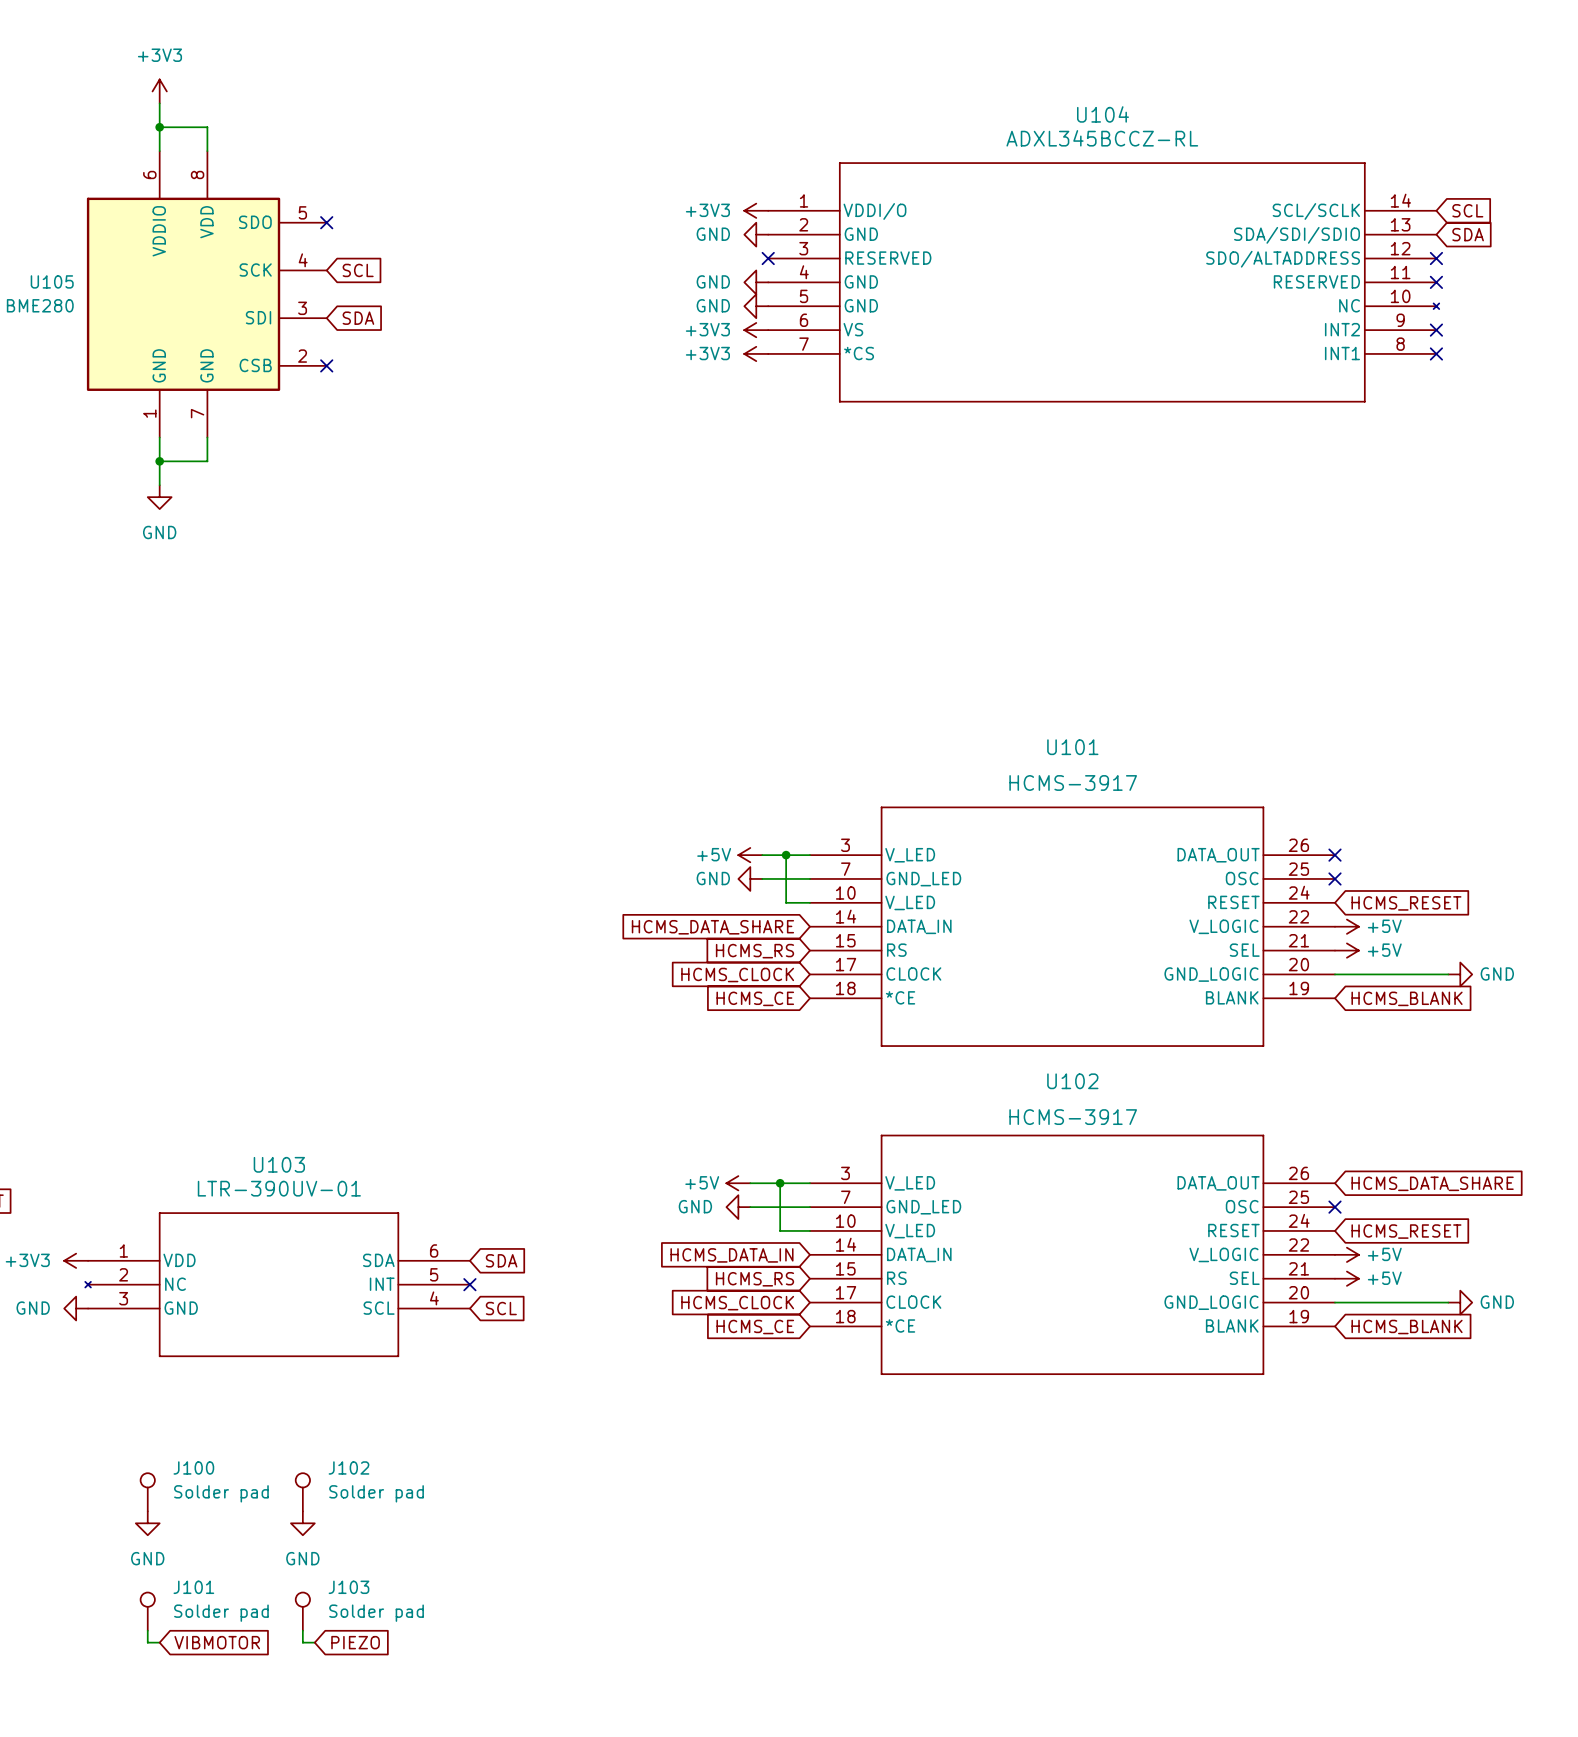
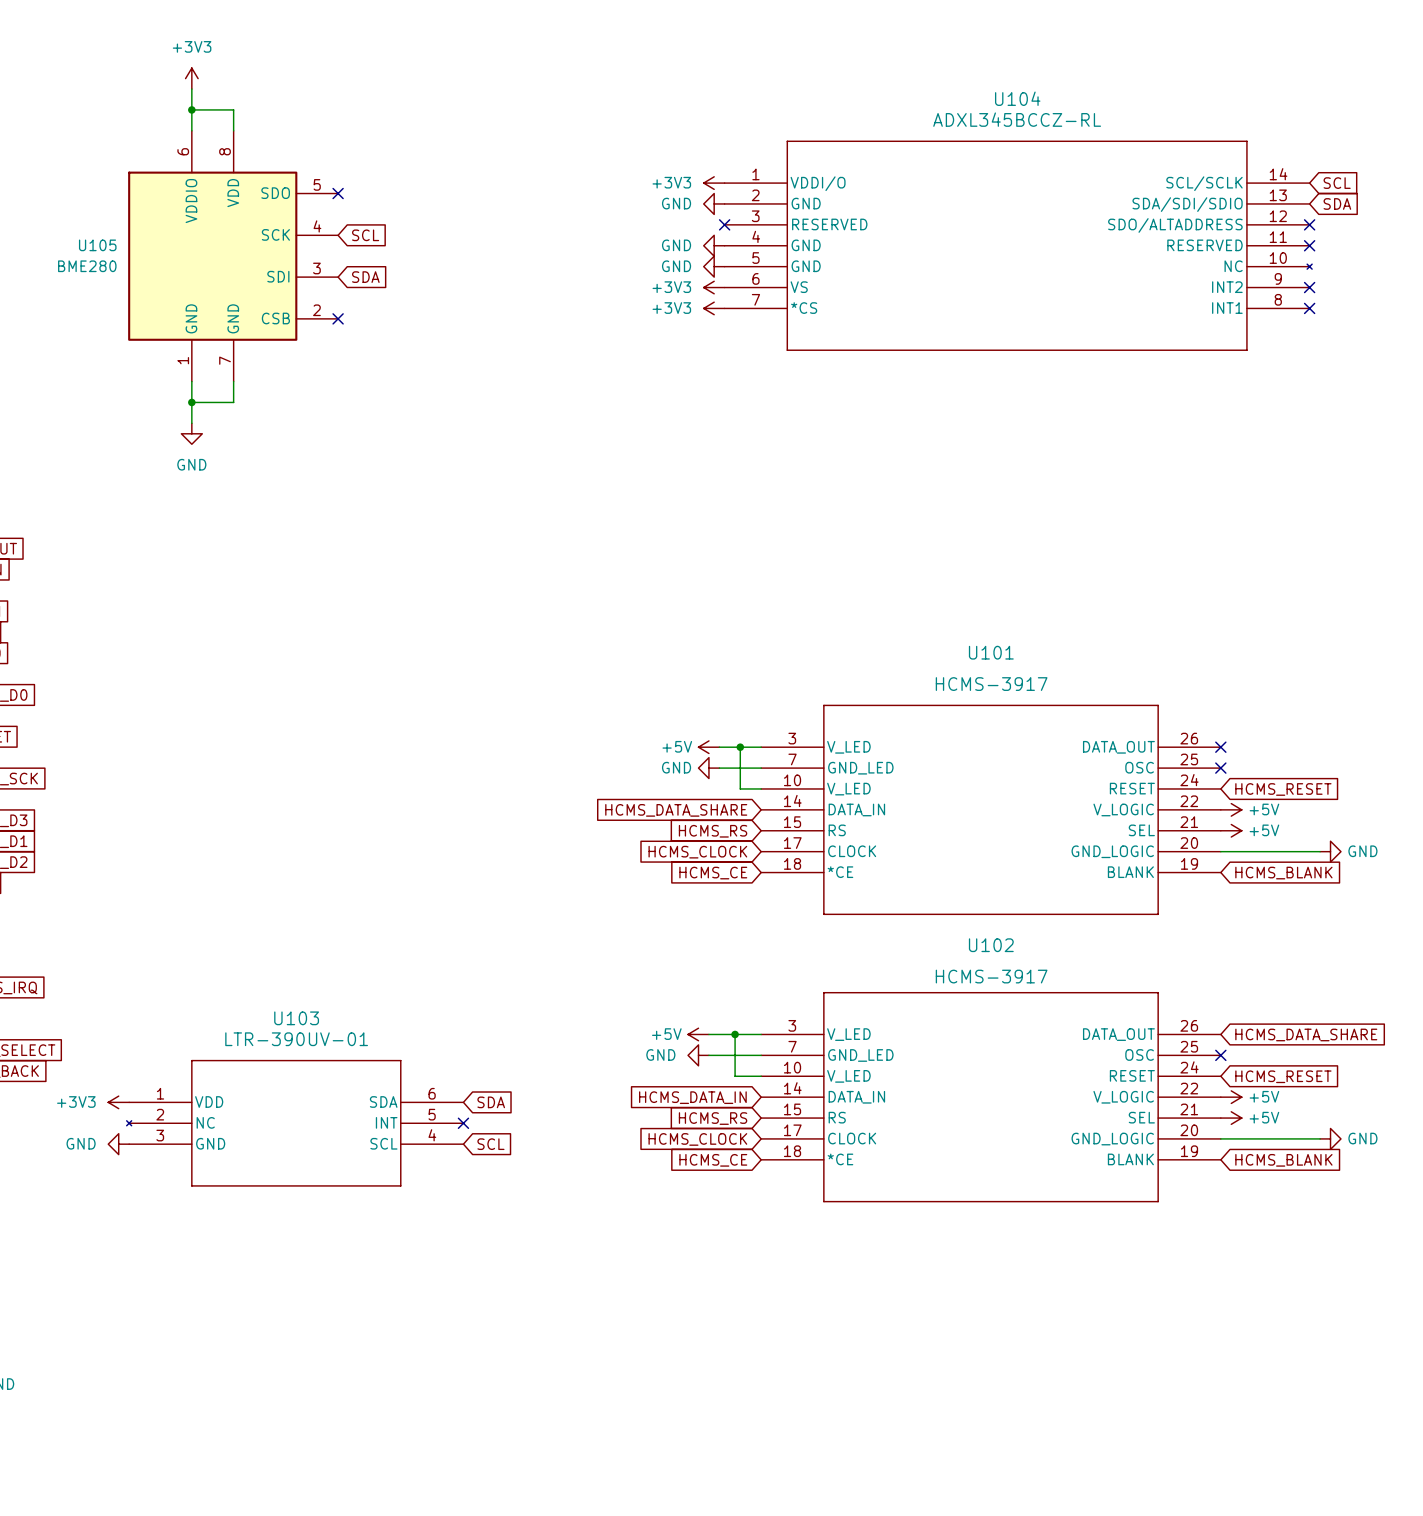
J100: Solder pad (147, 1492) -> none
J102: Solder pad (302, 1492) -> none
power symbol: GND (147, 1523) -> none
power symbol: GND (302, 1523) -> none
J101: Solder pad (147, 1611) -> none
J103: Solder pad (302, 1611) -> none
wire: (147, 1630) (147, 1642) (159, 1642) -> none
wire: (302, 1630) (302, 1642) (314, 1642) -> none
global label: VIBMOTOR (217, 1642) -> none
global label: PIEZO (355, 1642) -> none

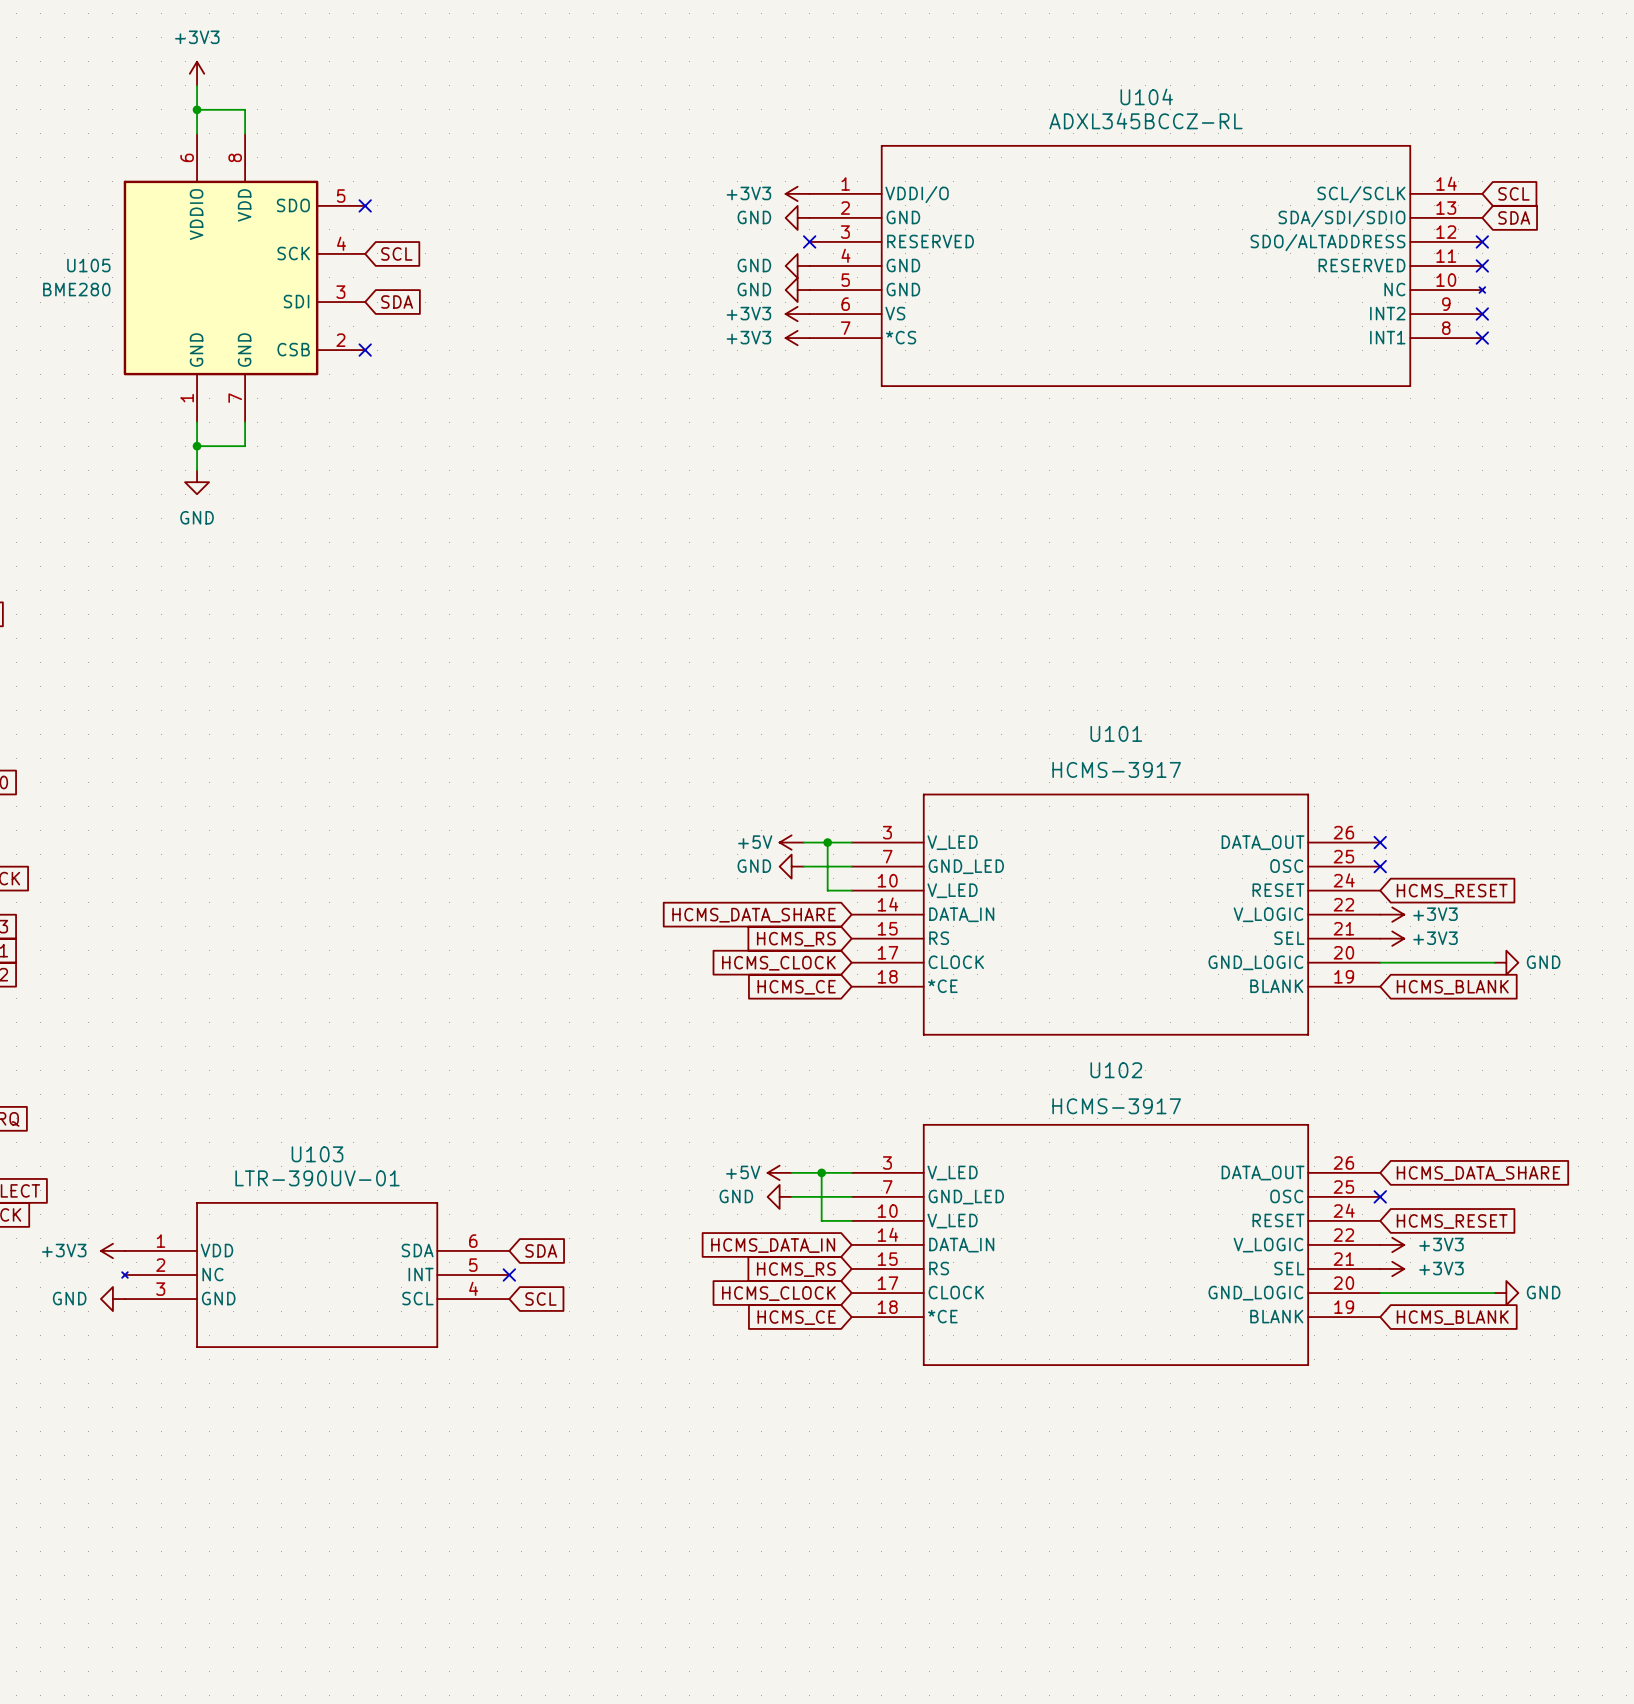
power symbol: +5V (1231, 809) -> +3V3 (1392, 914)
power symbol: +5V (1231, 830) -> +3V3 (1392, 938)
power symbol: +5V (1231, 1097) -> +3V3 (1392, 1244)
power symbol: +5V (1231, 1118) -> +3V3 (1392, 1268)

